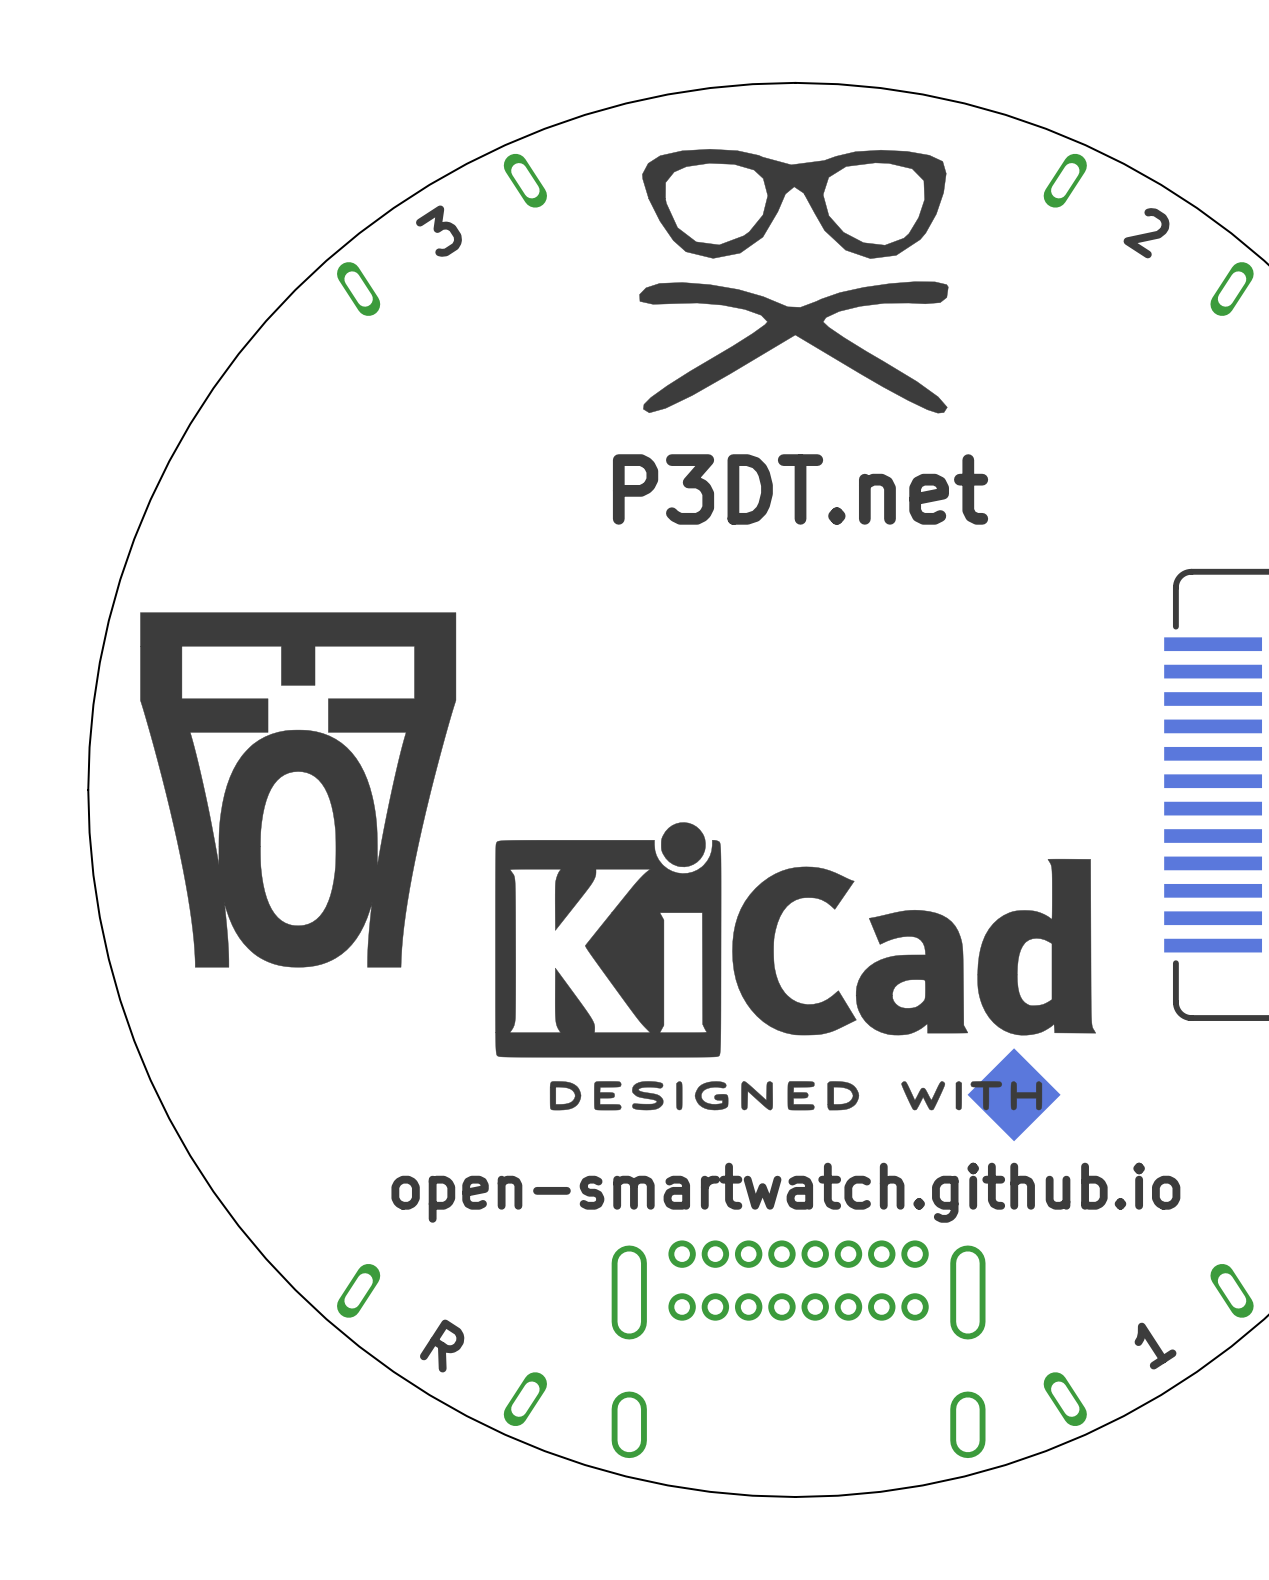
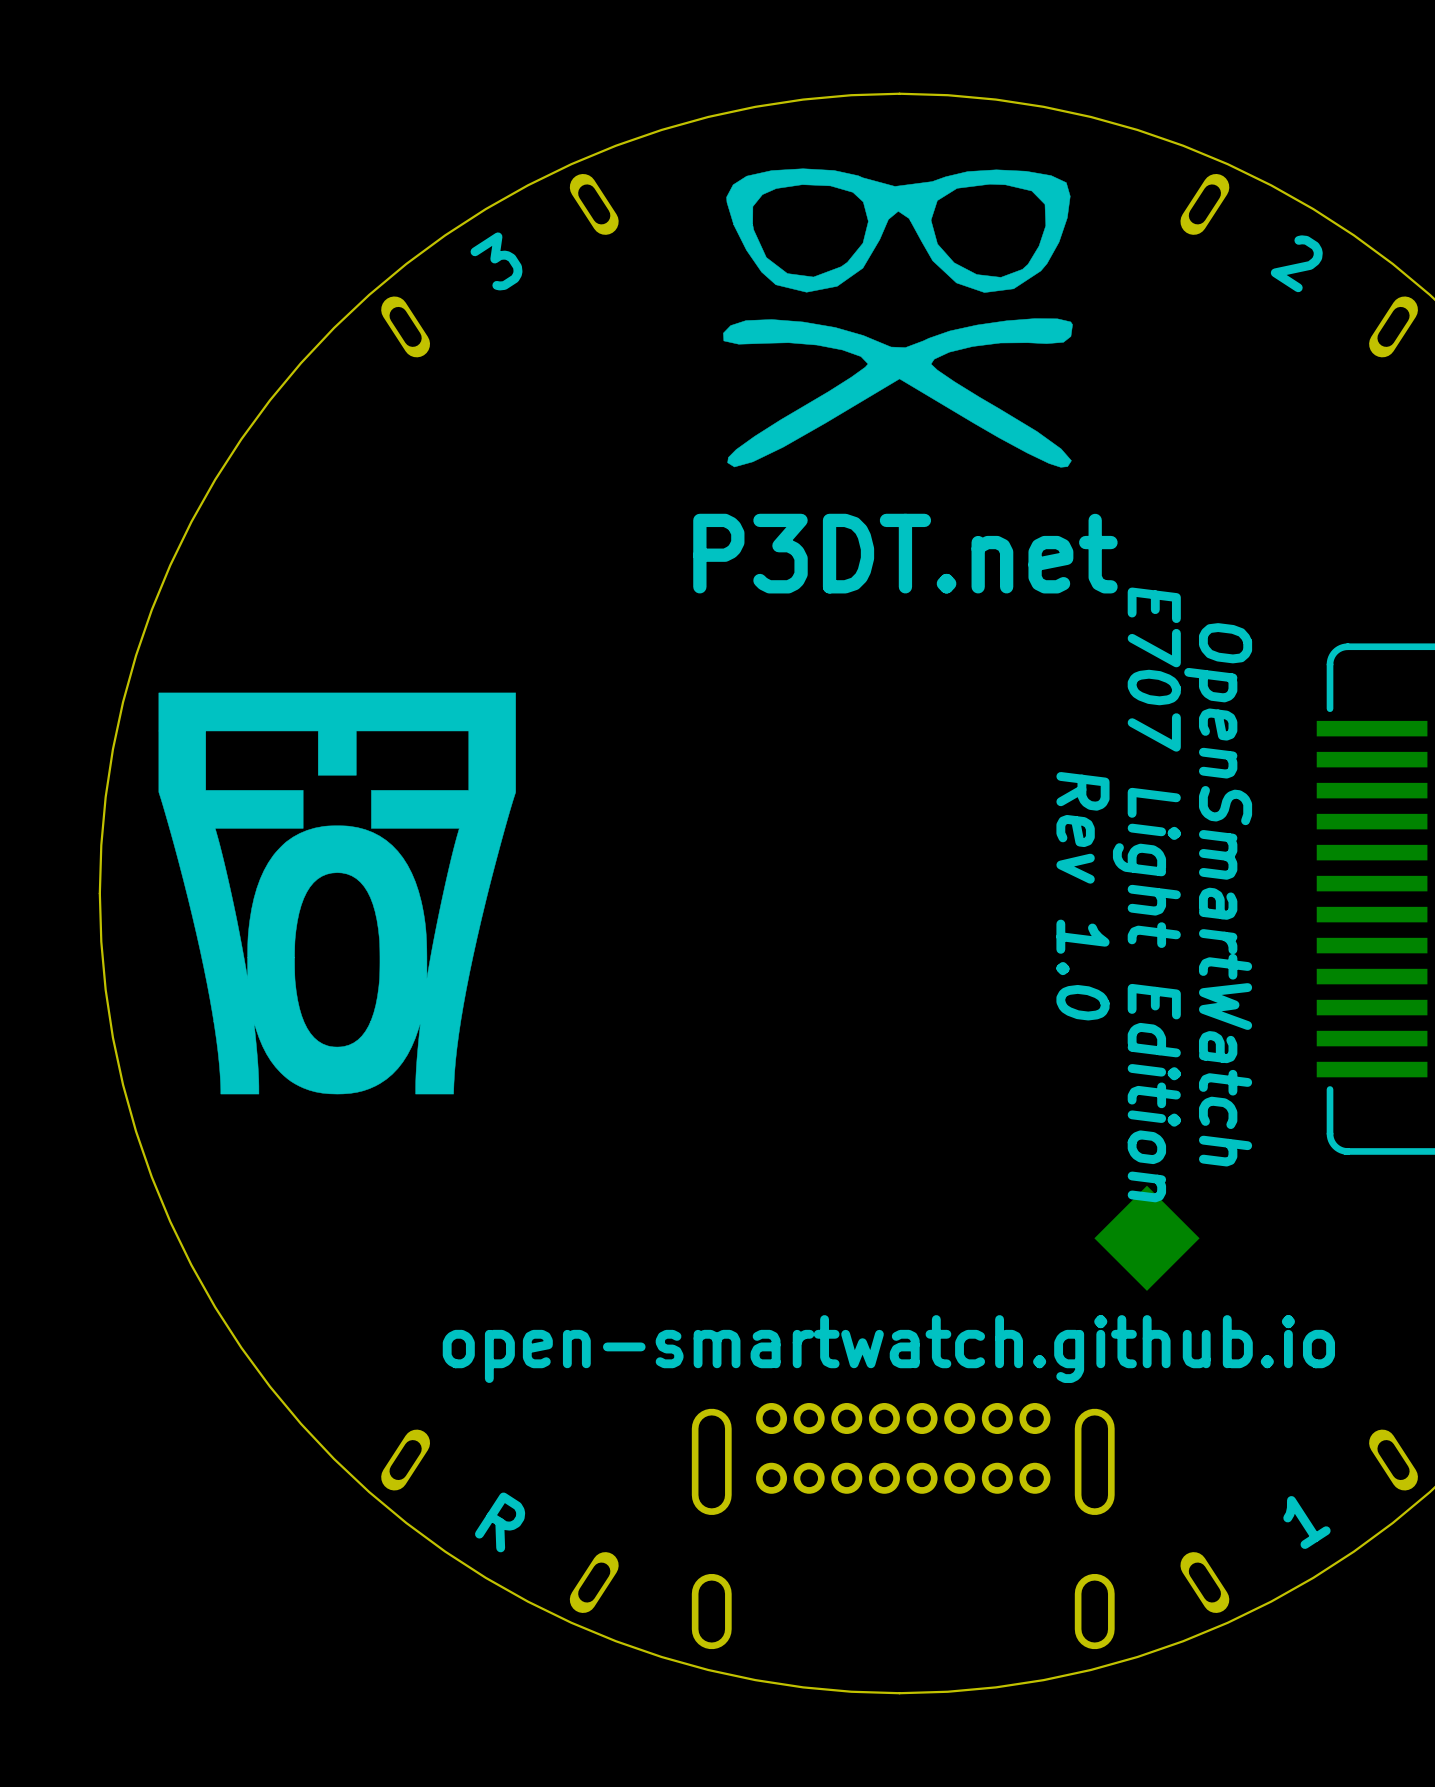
text: none -> E707 Light Edition (1146, 894)
text: none -> OpenSmartWatch (1218, 894)
text: none -> Rev 1.0 (1082, 896)
drawing: [495, 822, 1097, 1111] -> none

